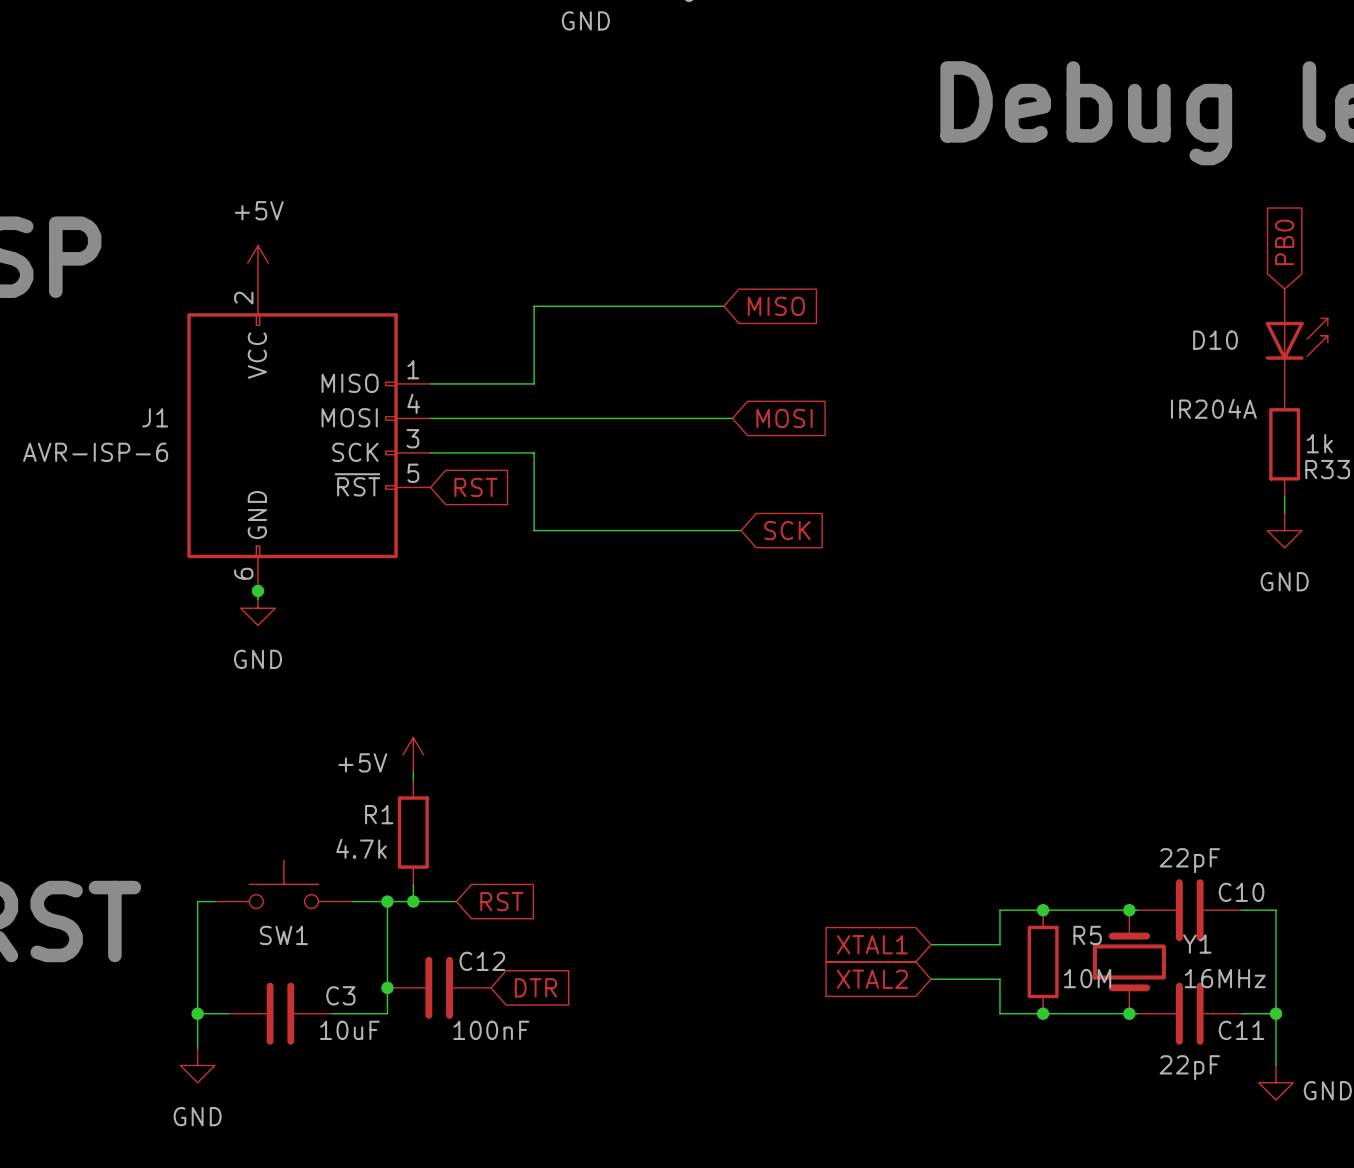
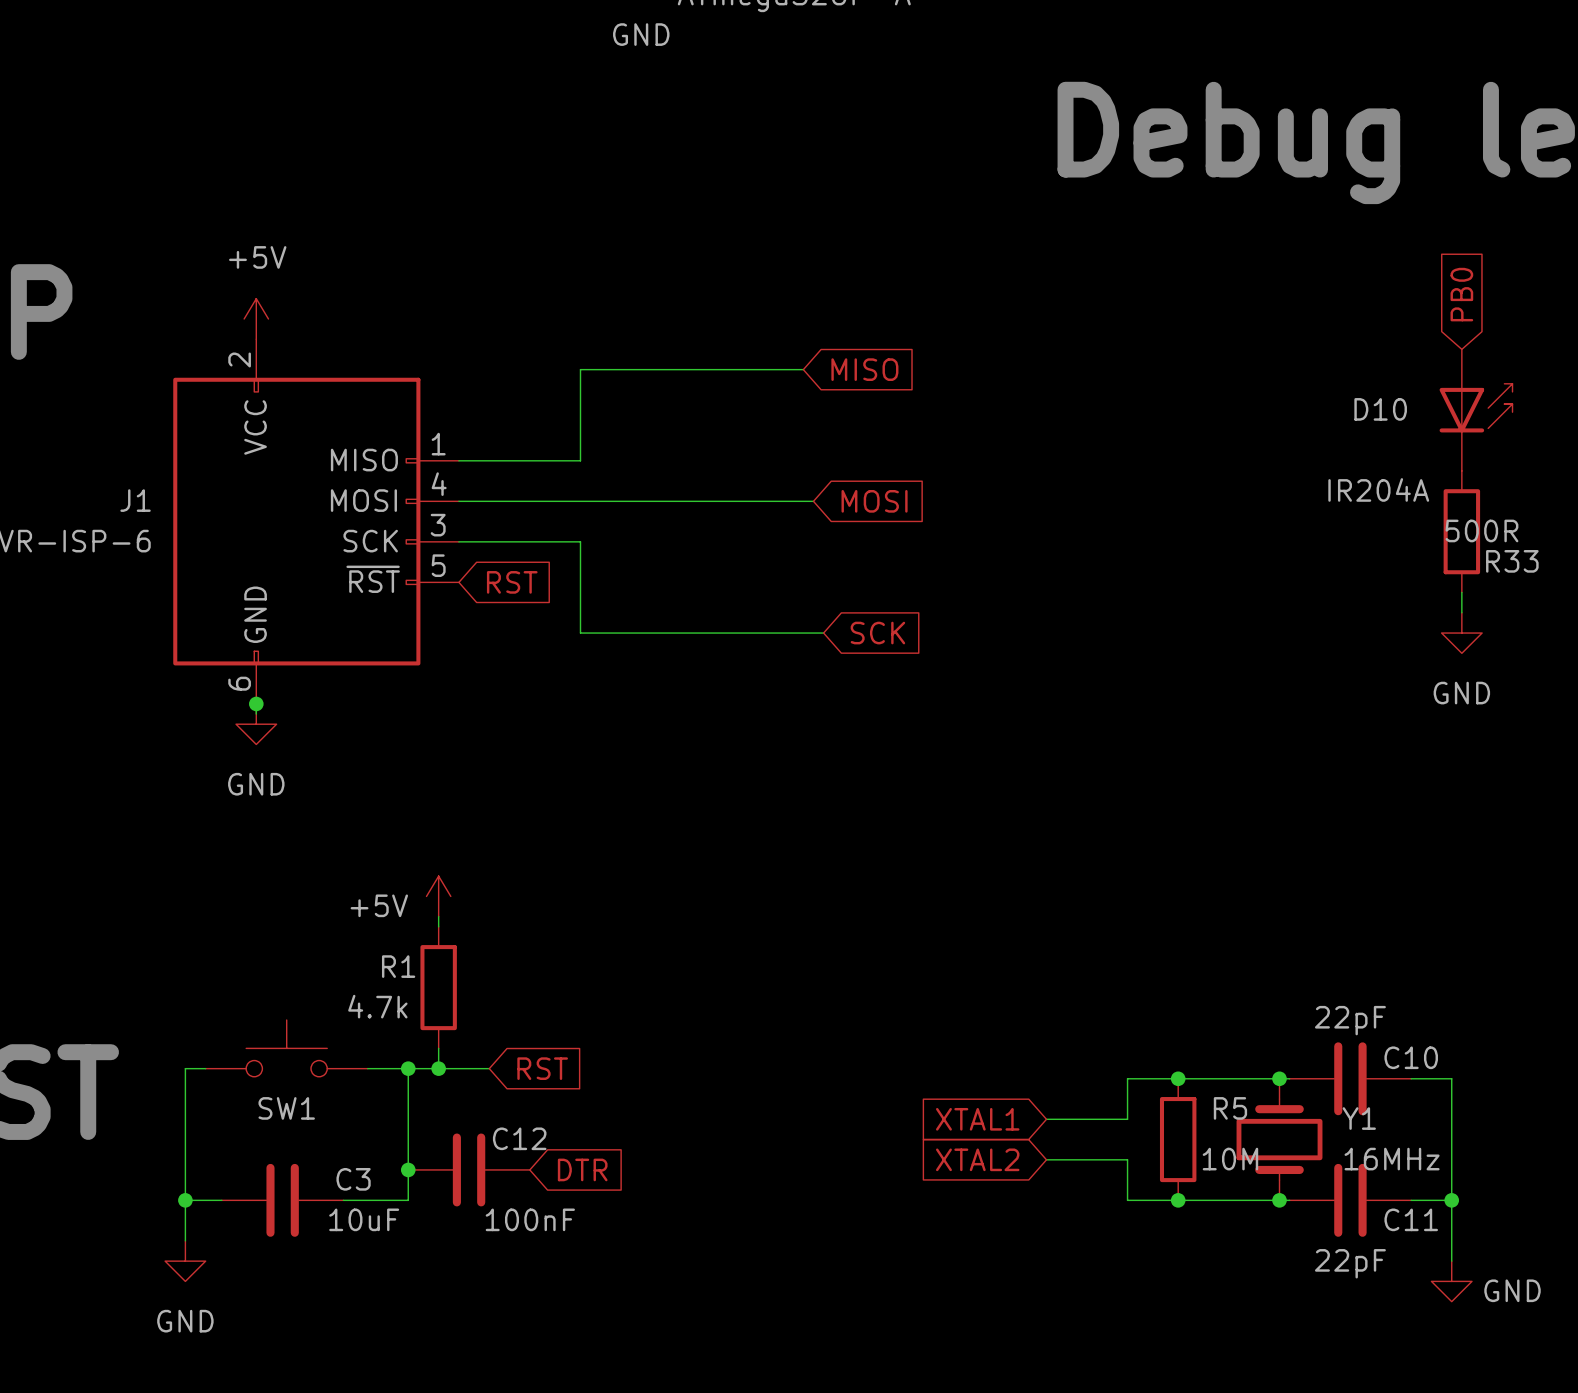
R33 value: 1k (1319, 443) -> 500R (1481, 530)

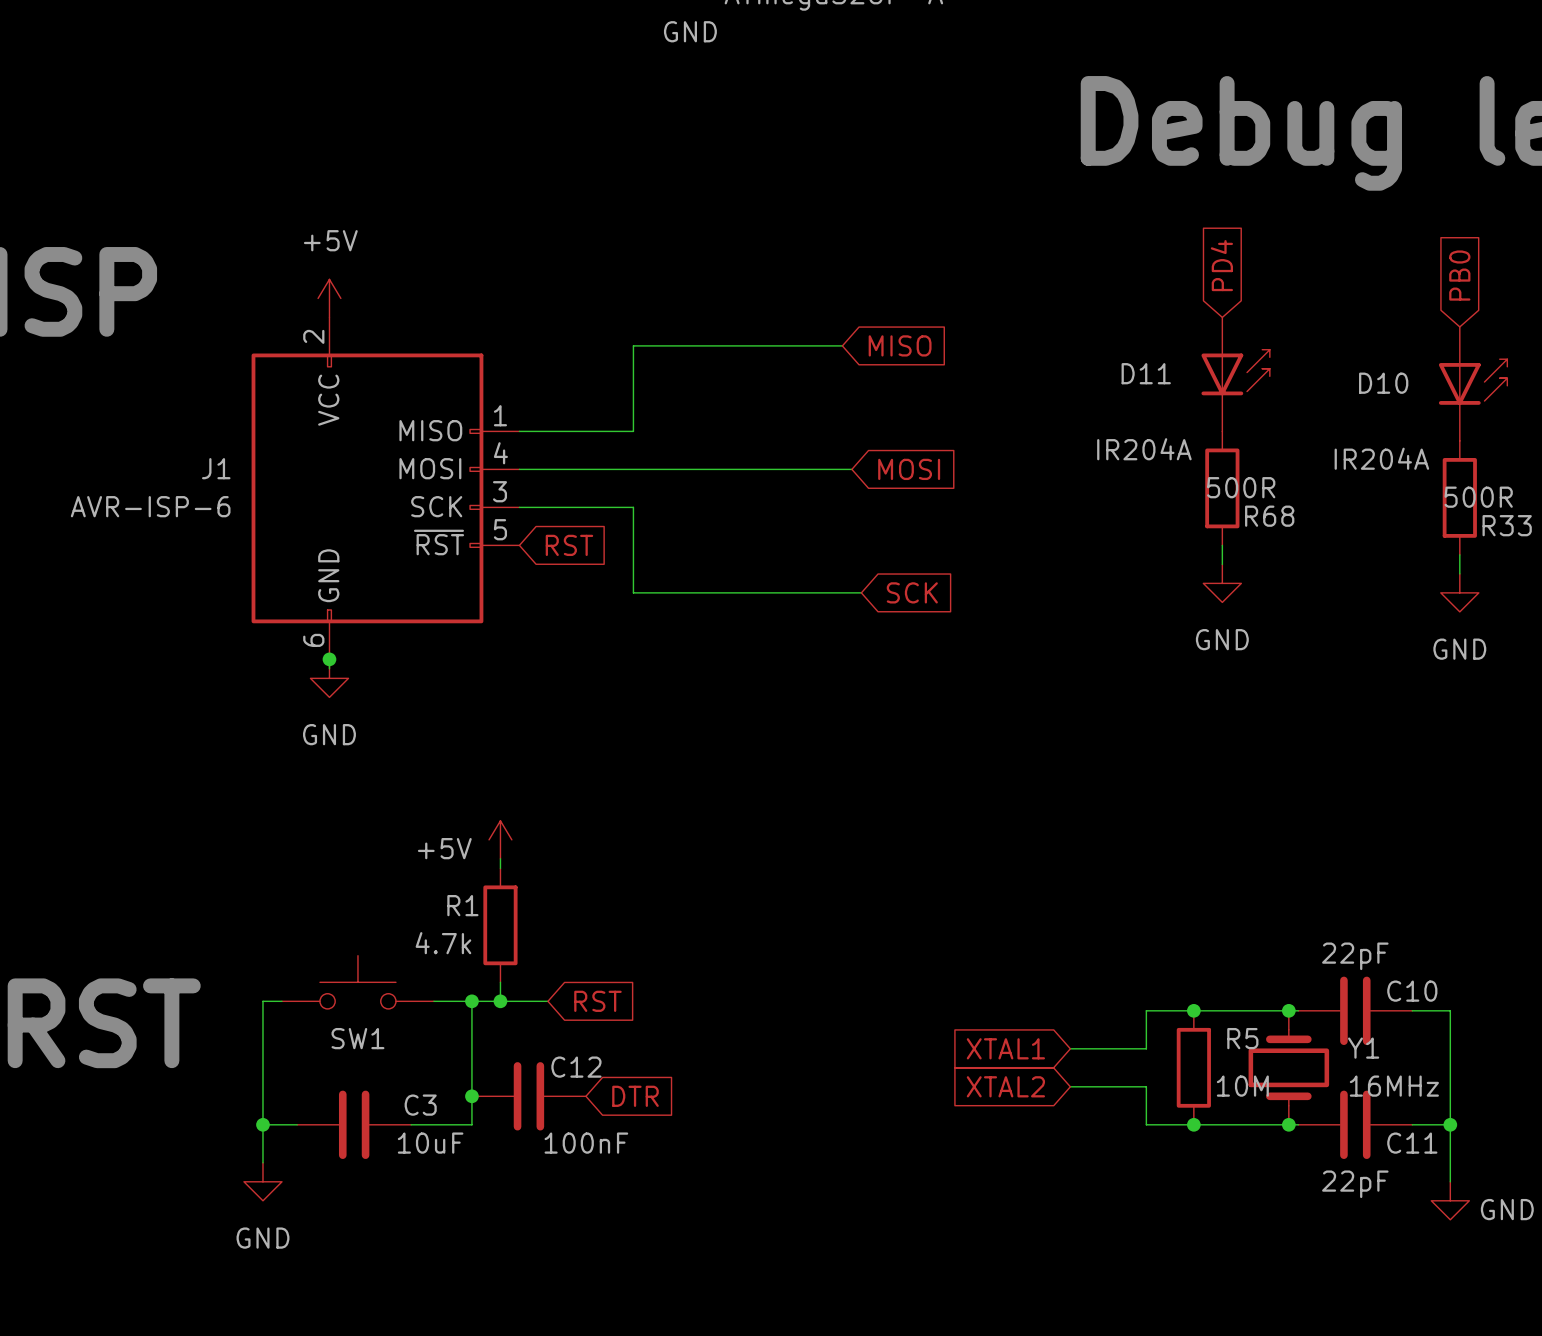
global label: none -> PD4 (1221, 265)
D11: none -> IR204A (1235, 374)
R68: none -> 500R (1222, 488)
wire: none -> (1222, 545) (1222, 564)
power symbol: none -> GND (1222, 583)

